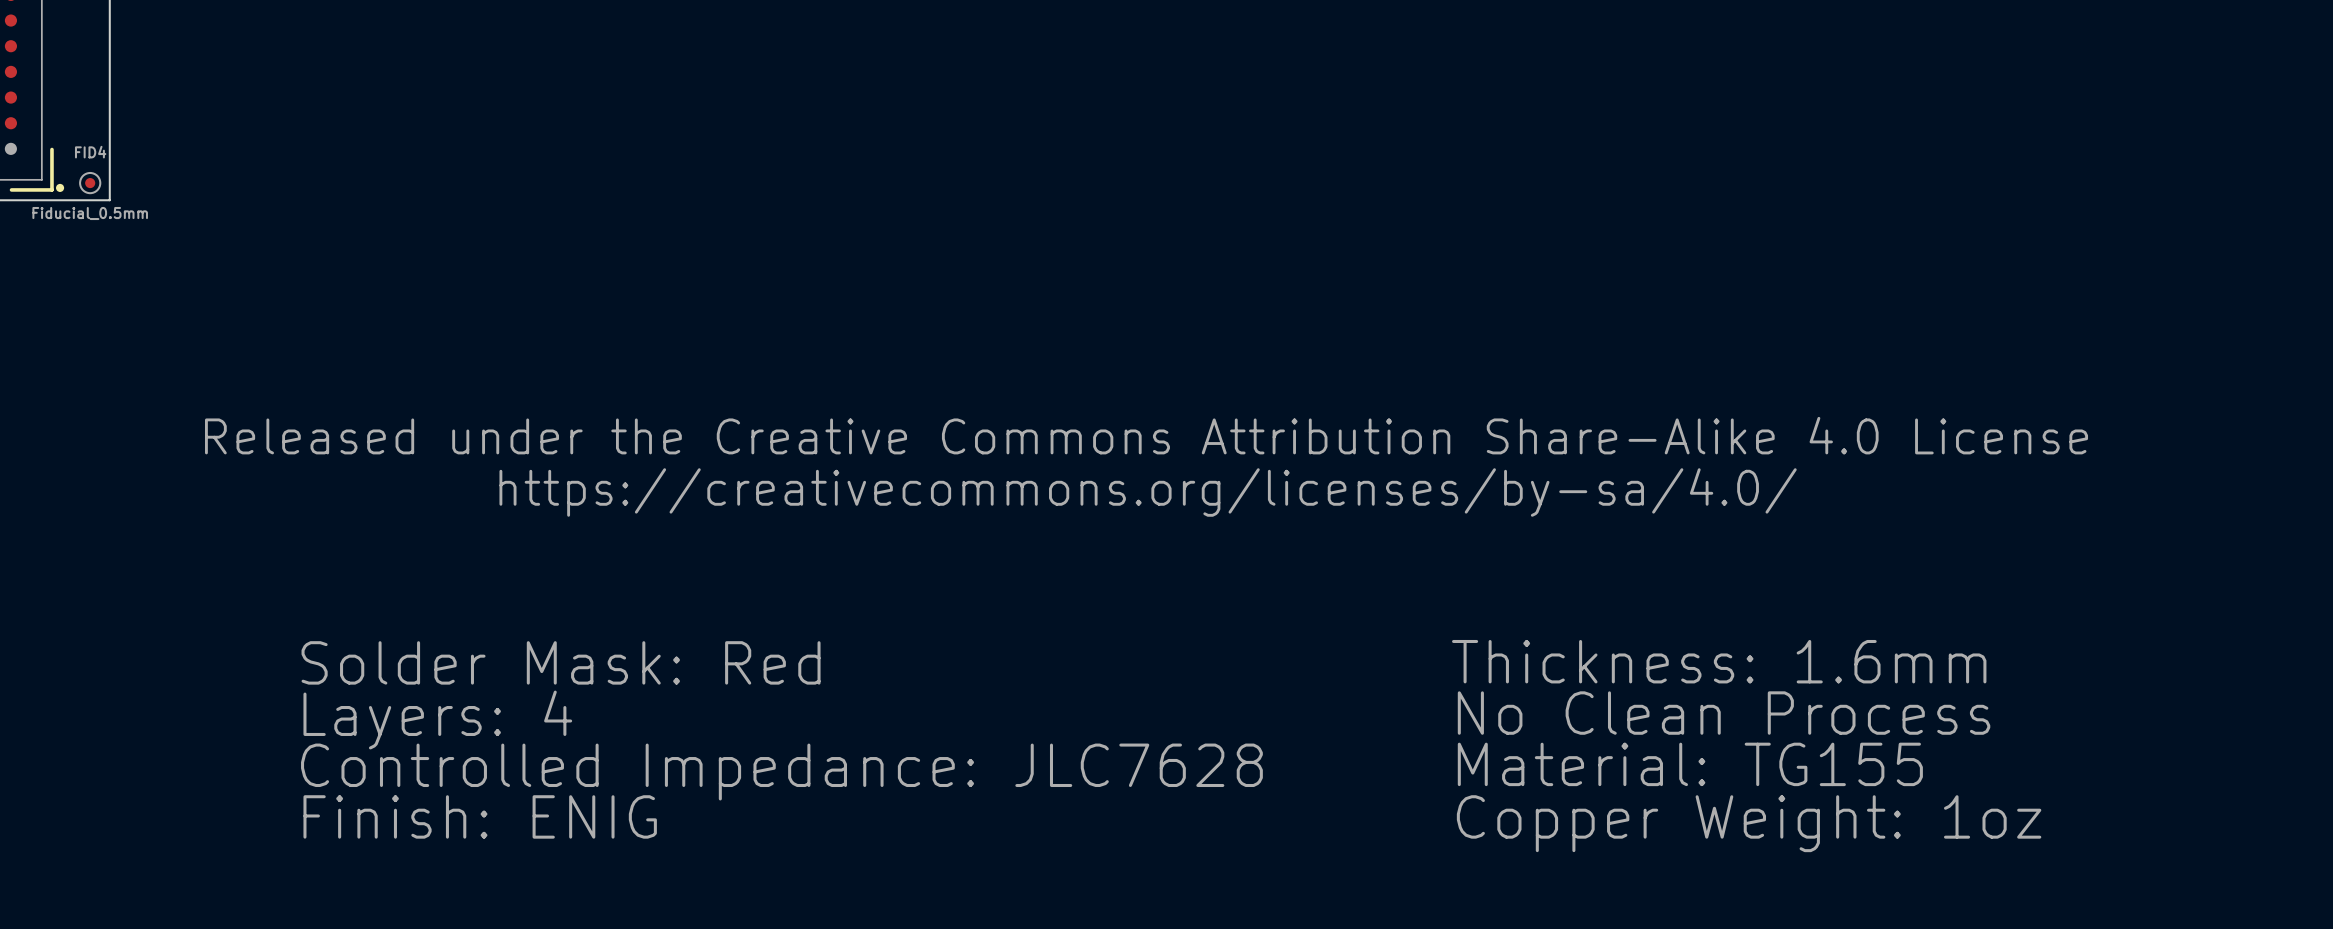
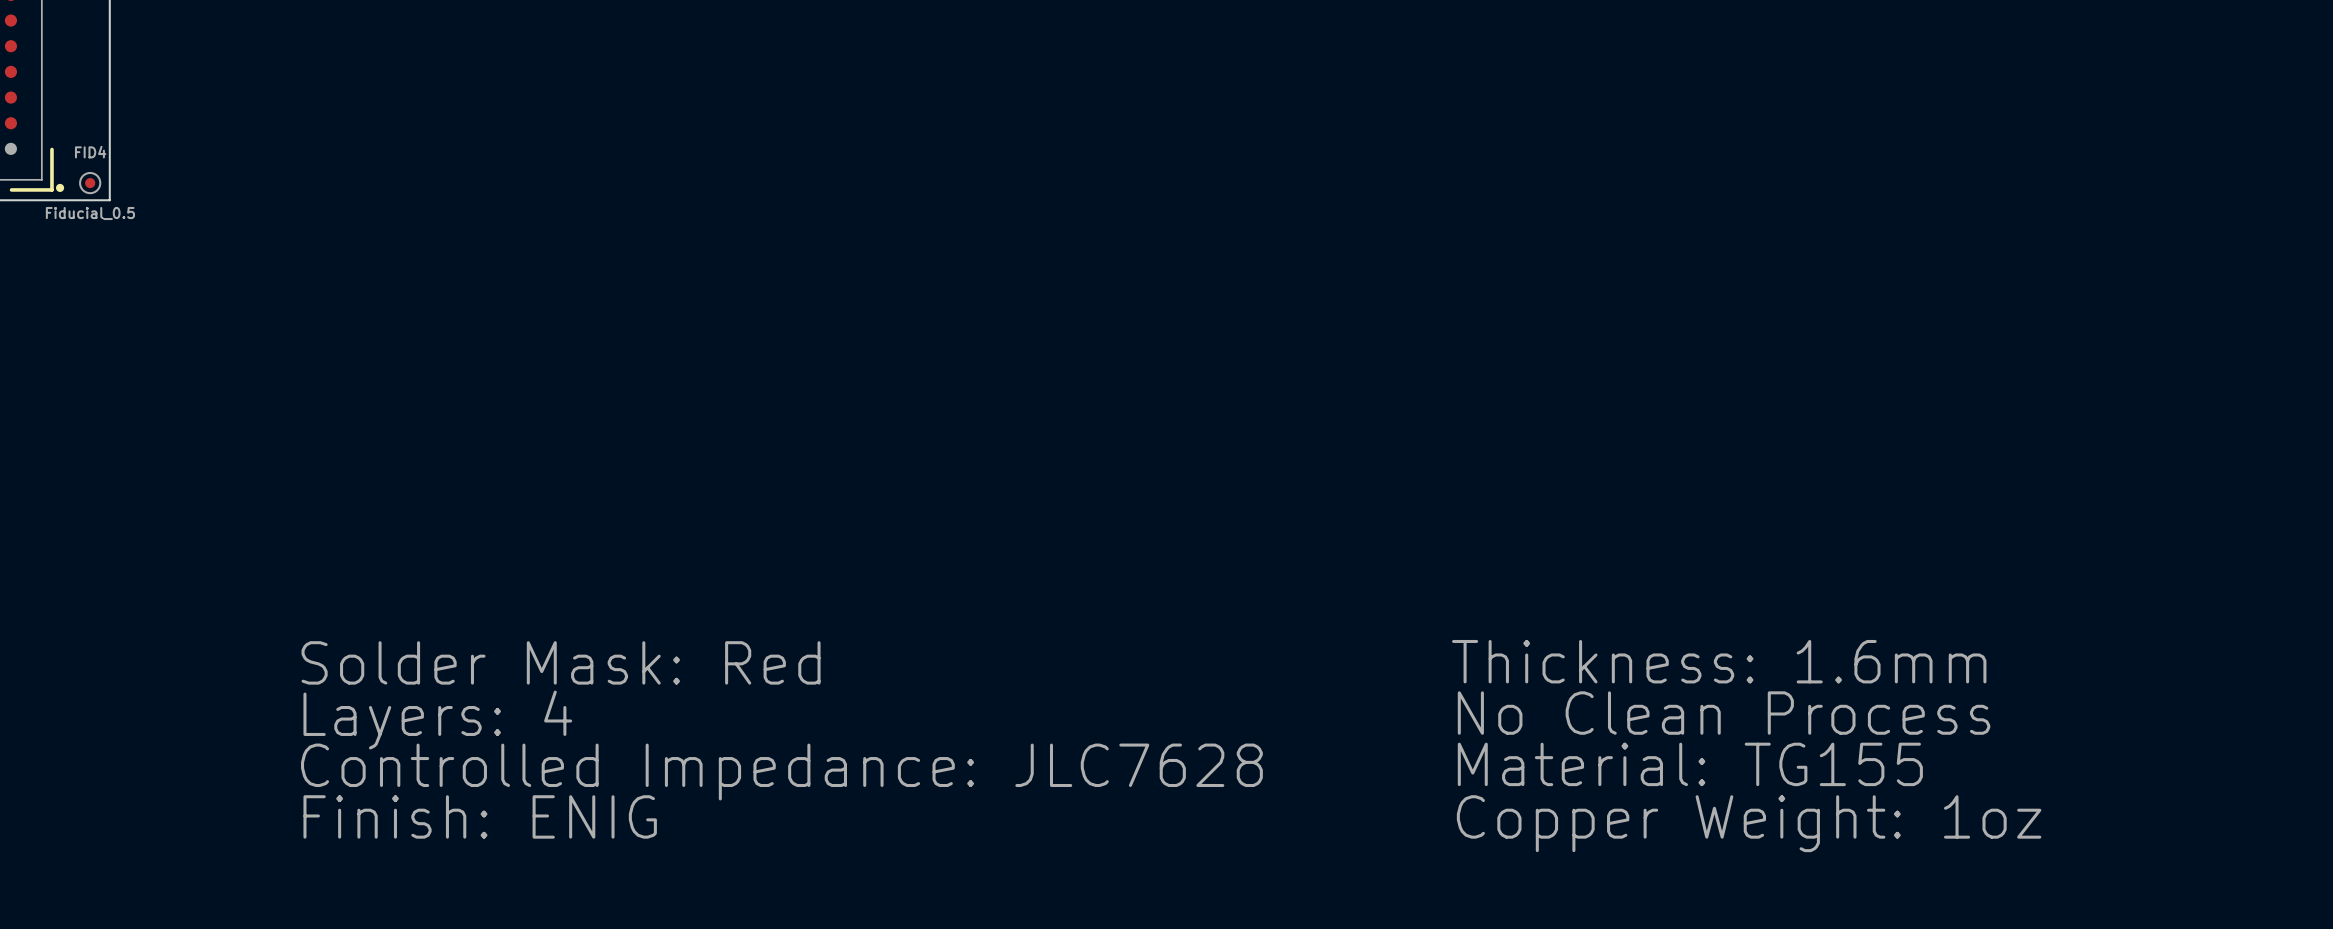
FID4 value: Fiducial_0.5mm (90, 213) -> Fiducial_0.5 (90, 213)
drawing: [205, 416, 2089, 517] -> none

